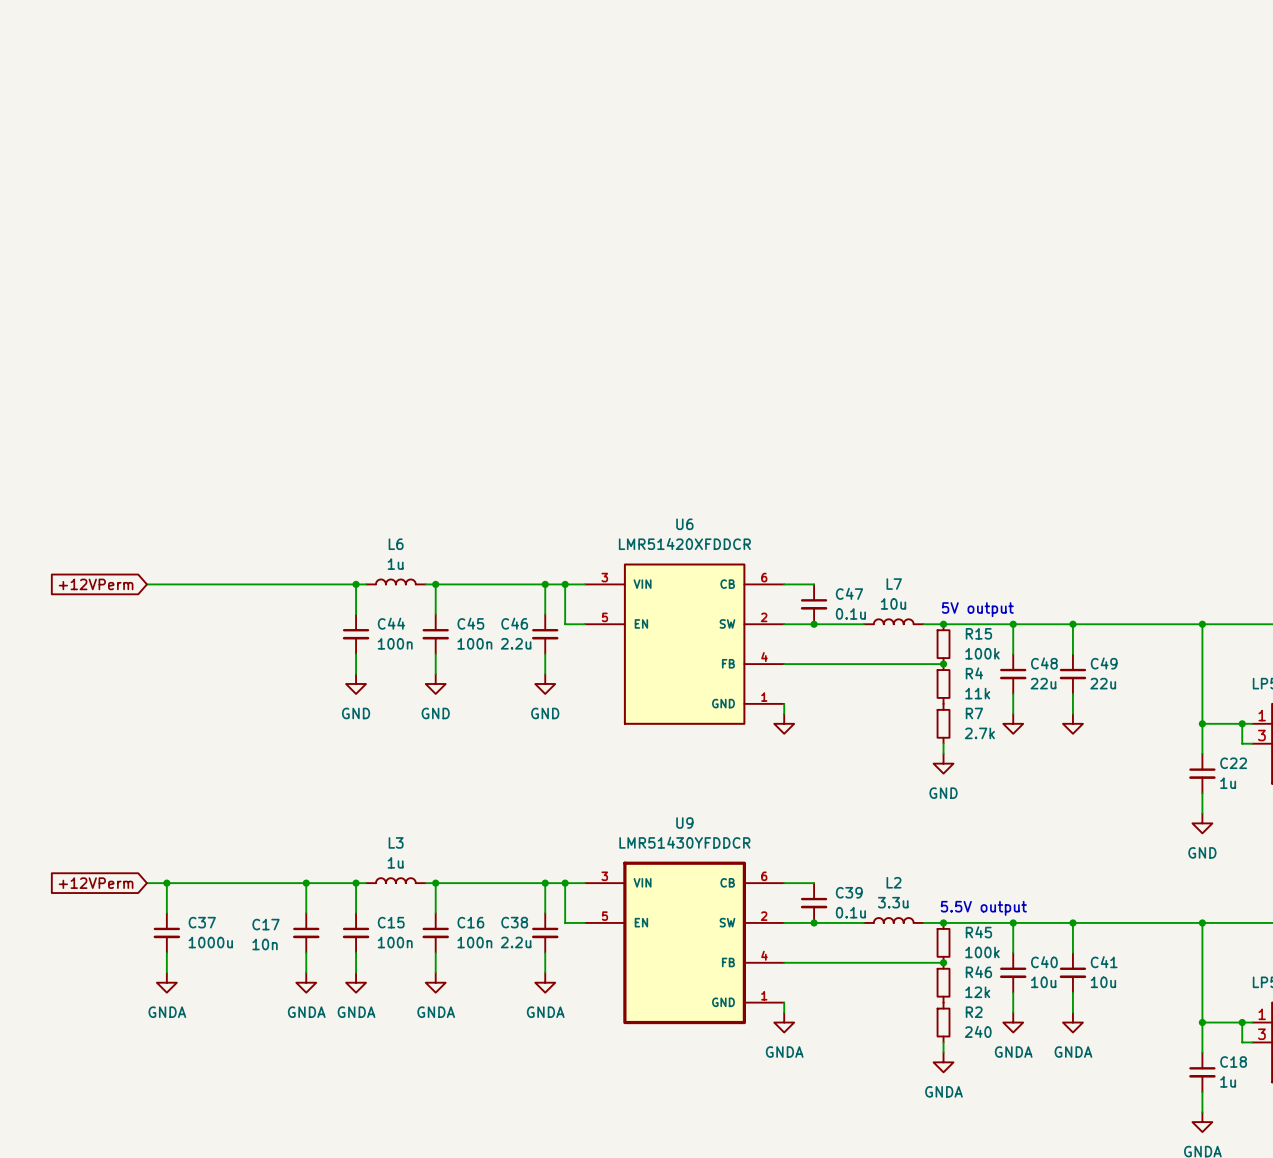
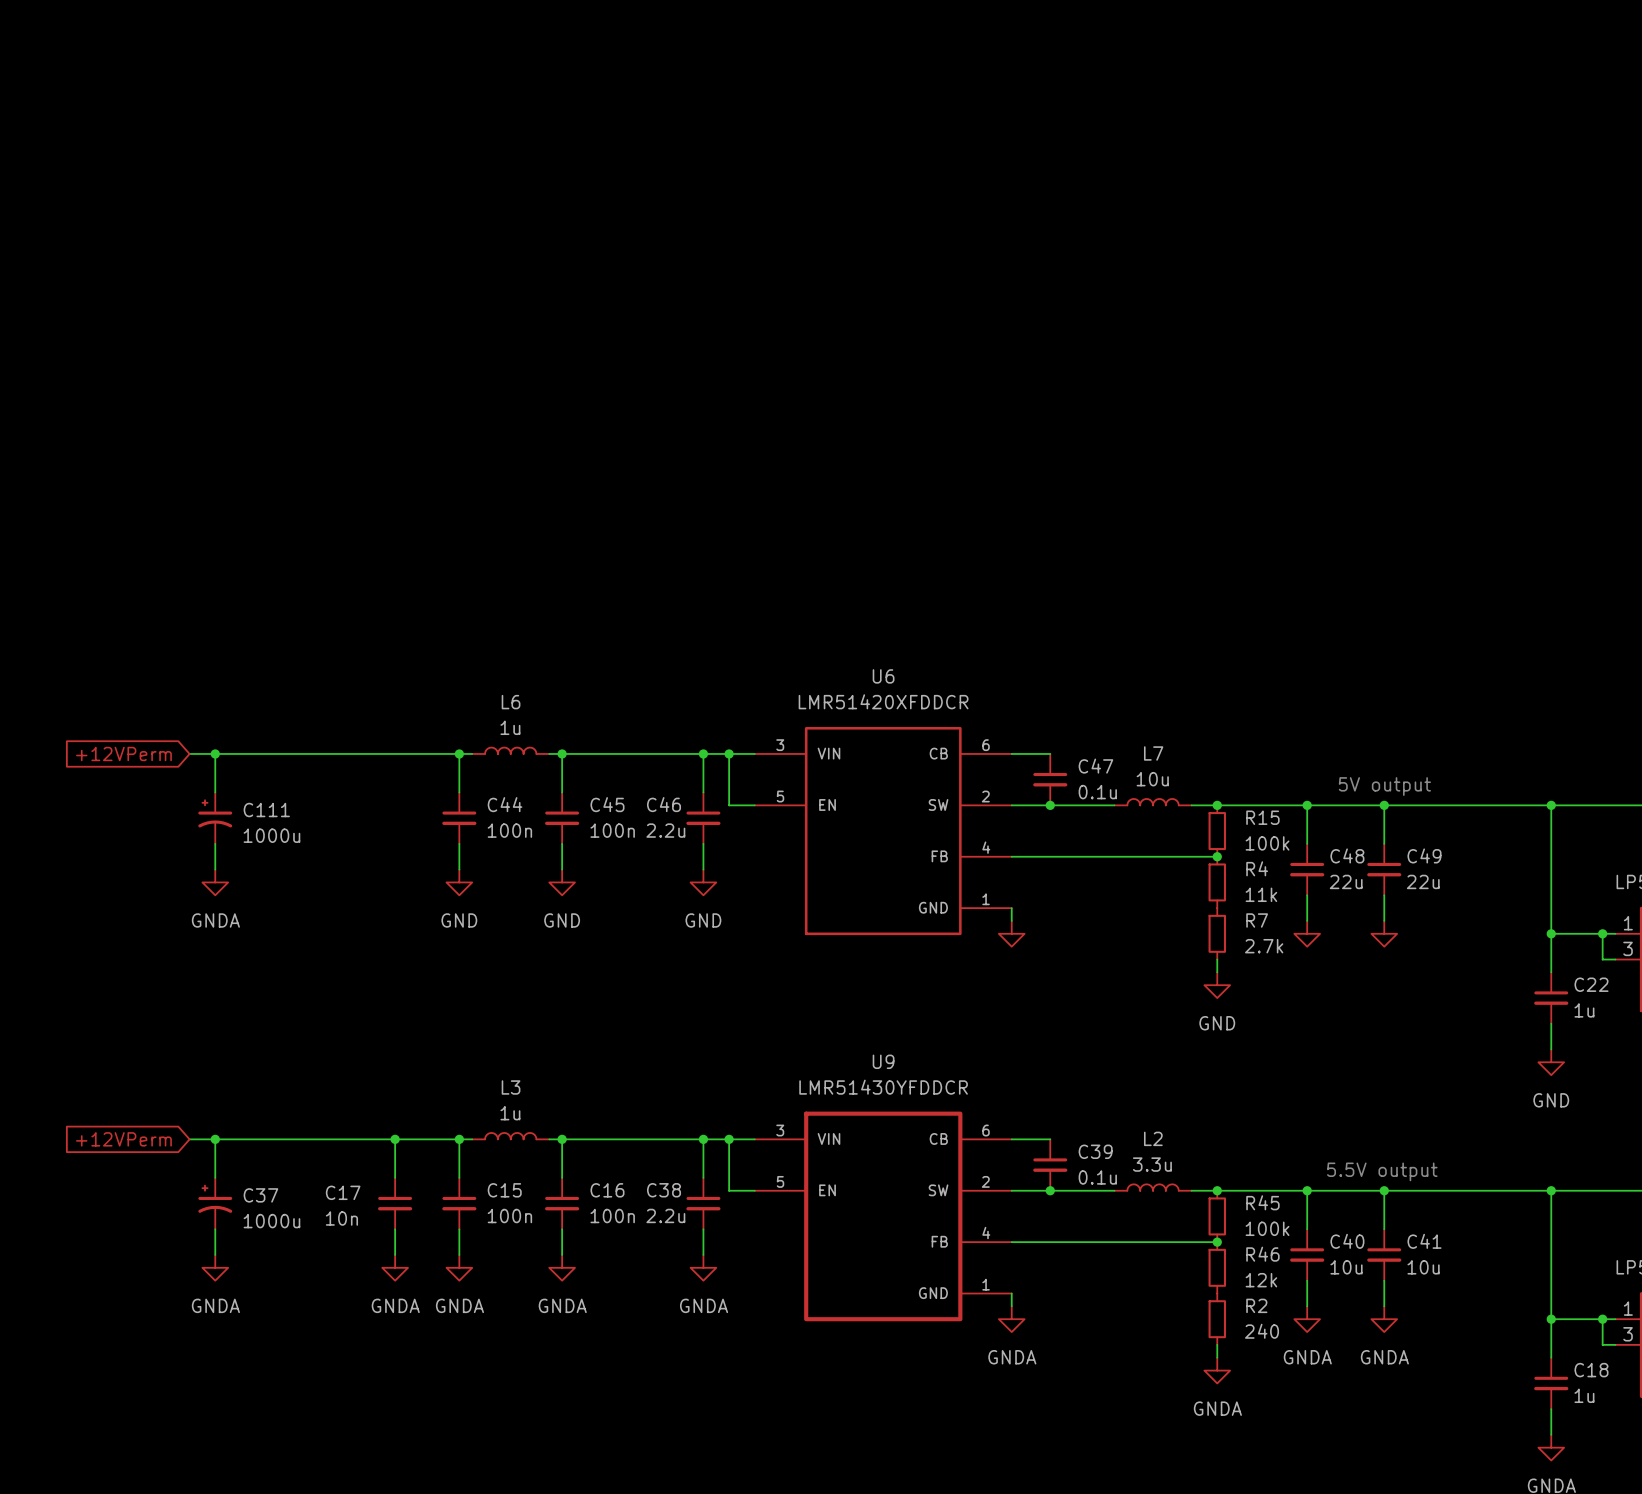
wire: none -> (215, 753) (215, 792)
junction: none -> (215, 753)
text position: 5V output (977, 609) -> 5V output (1384, 786)
C111: none -> 1000u (215, 818)
wire: none -> (215, 843) (215, 869)
power symbol: none -> GNDA (215, 882)
text position: 5.5V output (983, 908) -> 5.5V output (1382, 1171)
C37 symbol: [153, 913, 181, 953] -> [198, 1177, 233, 1230]

